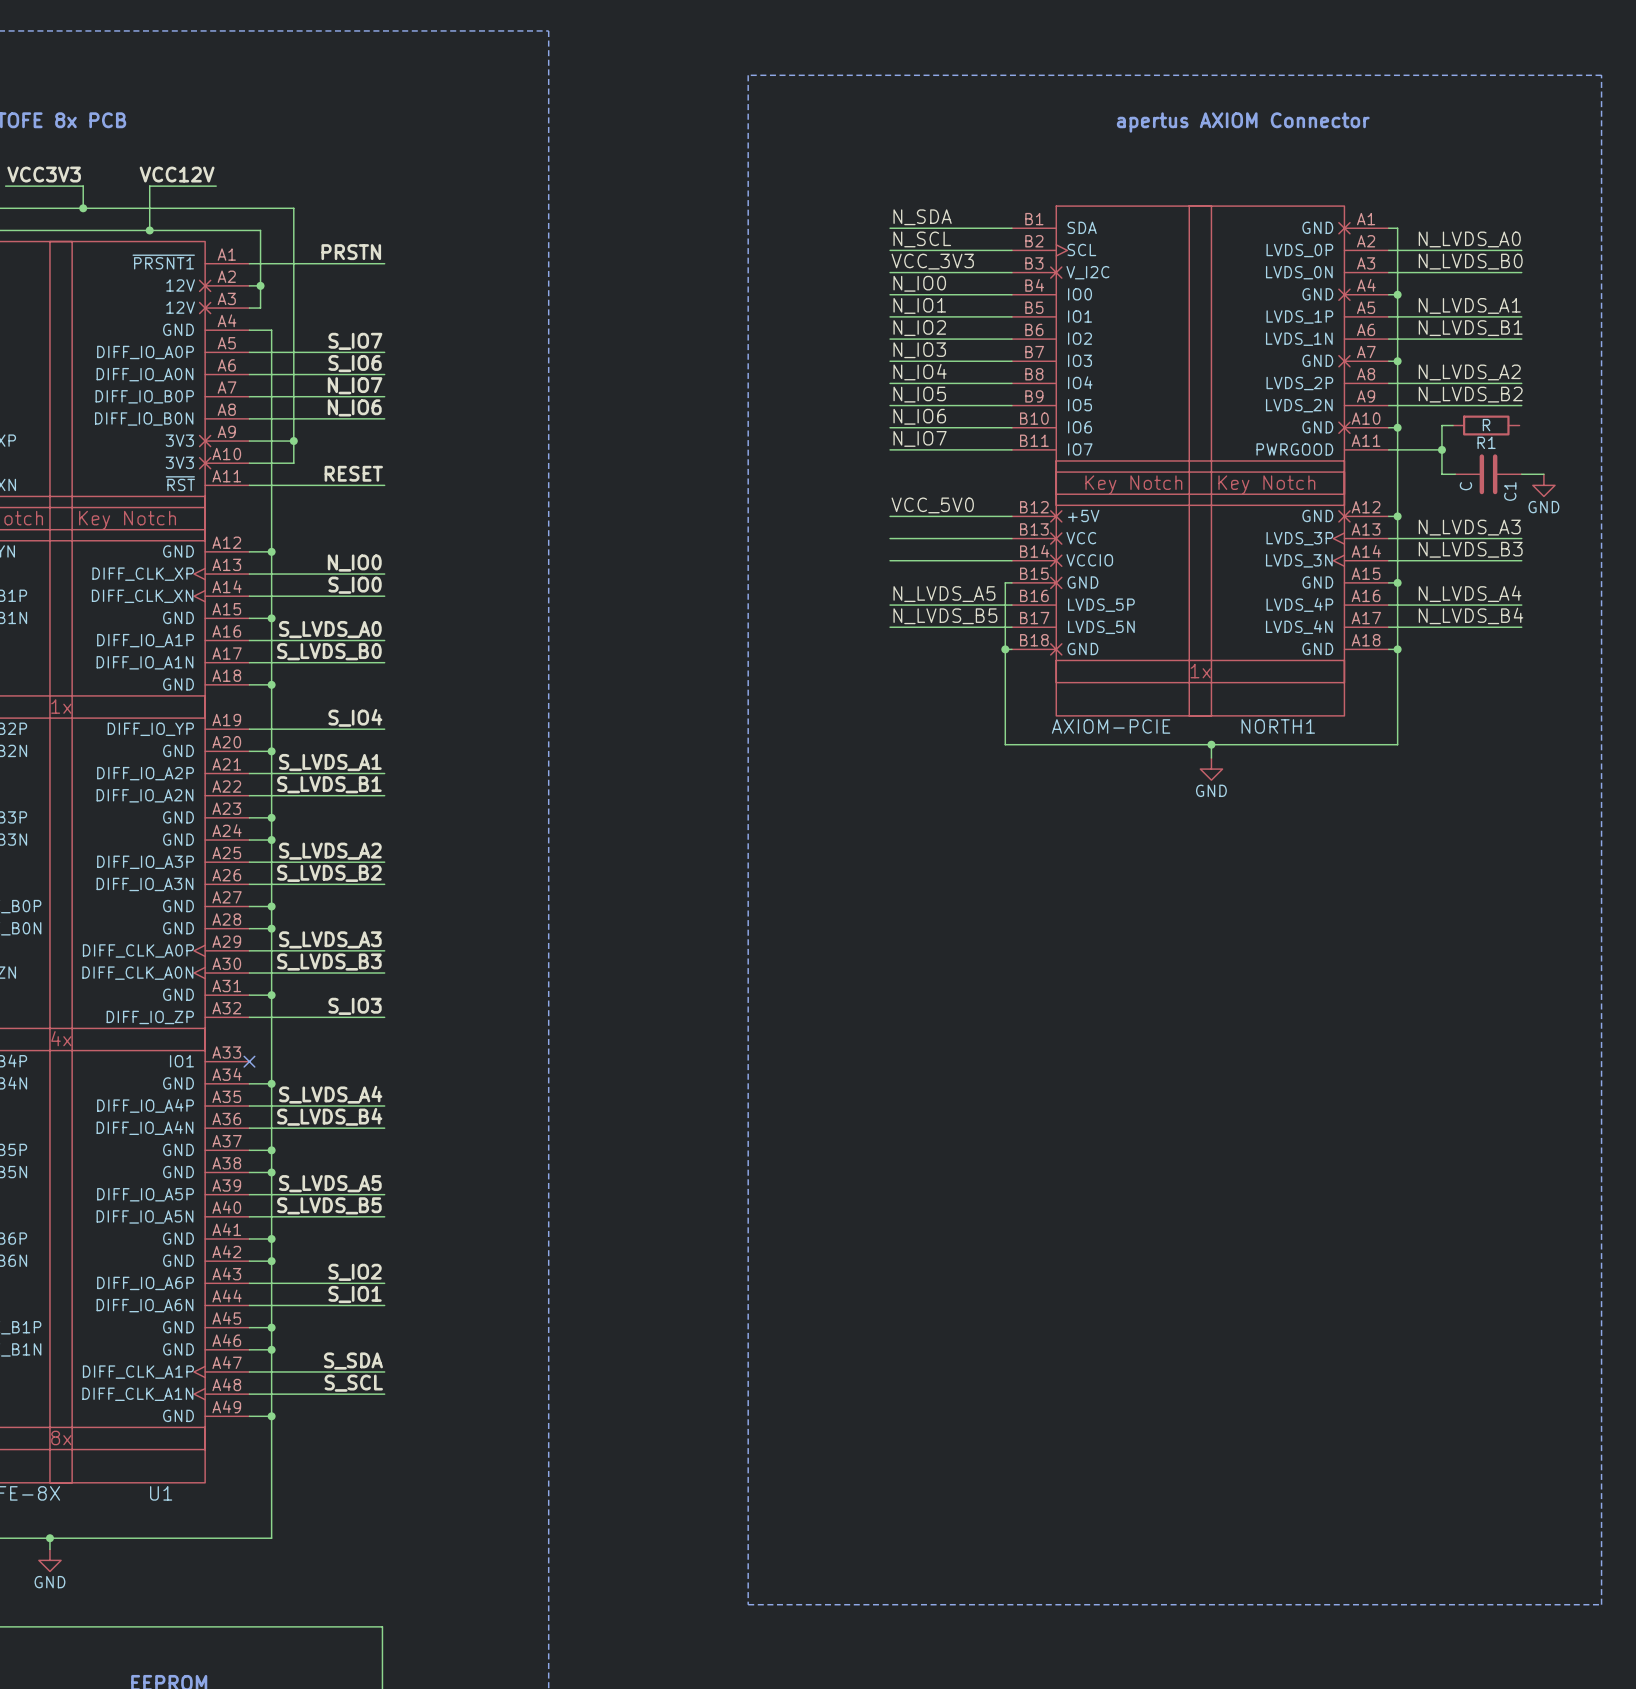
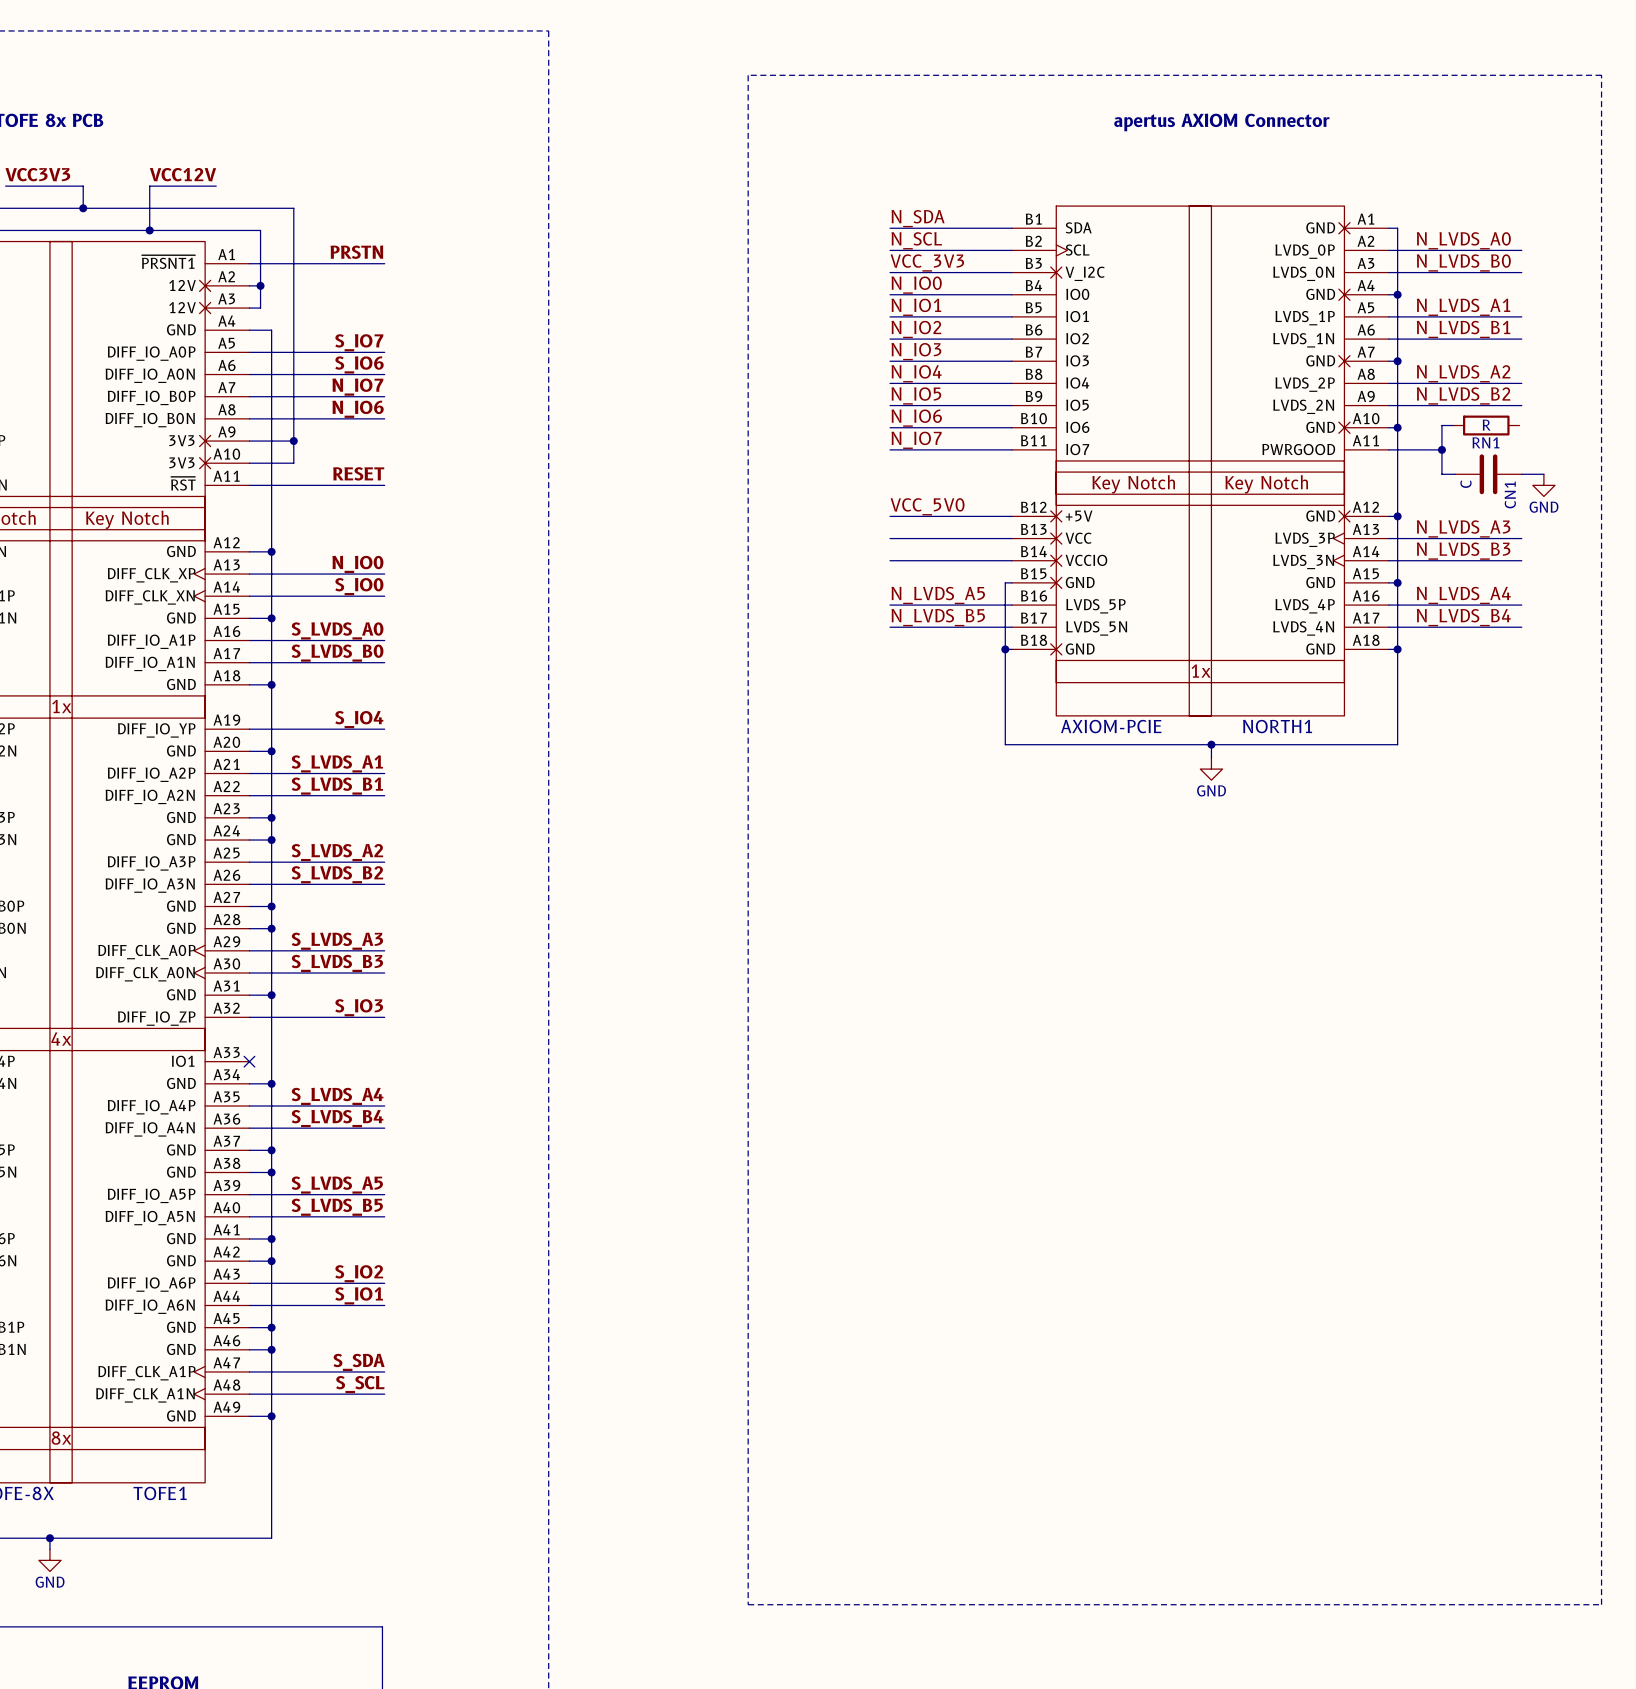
R1 name: R1 (1486, 442) -> RN1 (1485, 442)
C1 name: C1 (1510, 491) -> CN1 (1510, 494)
U1 name: U1 (161, 1493) -> TOFE1 (160, 1493)

